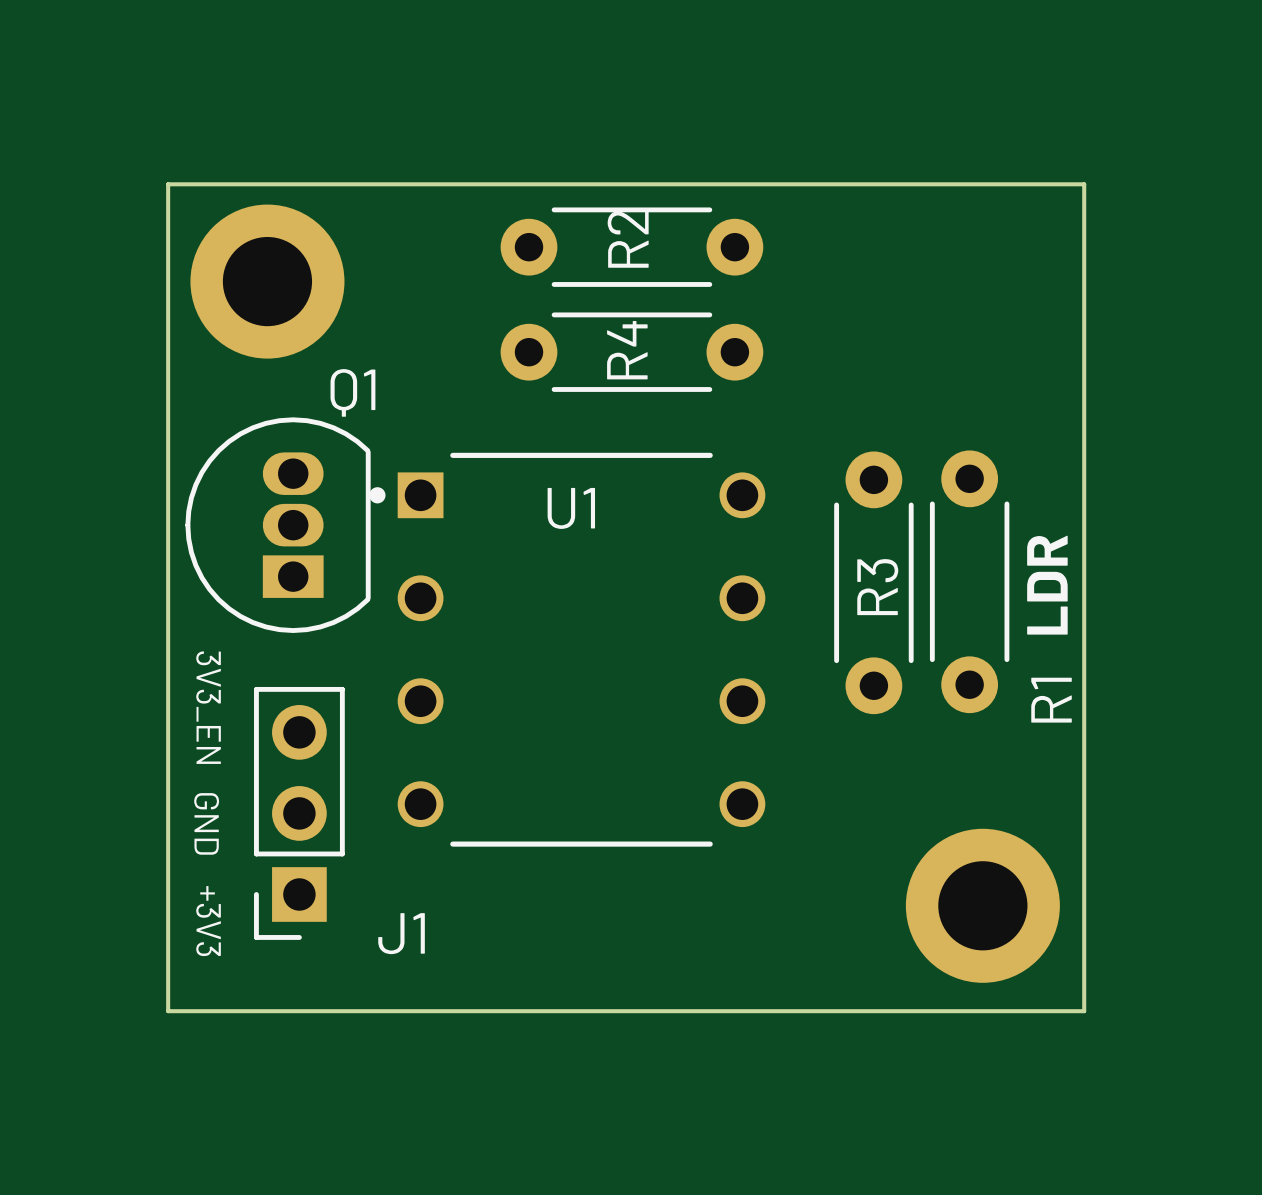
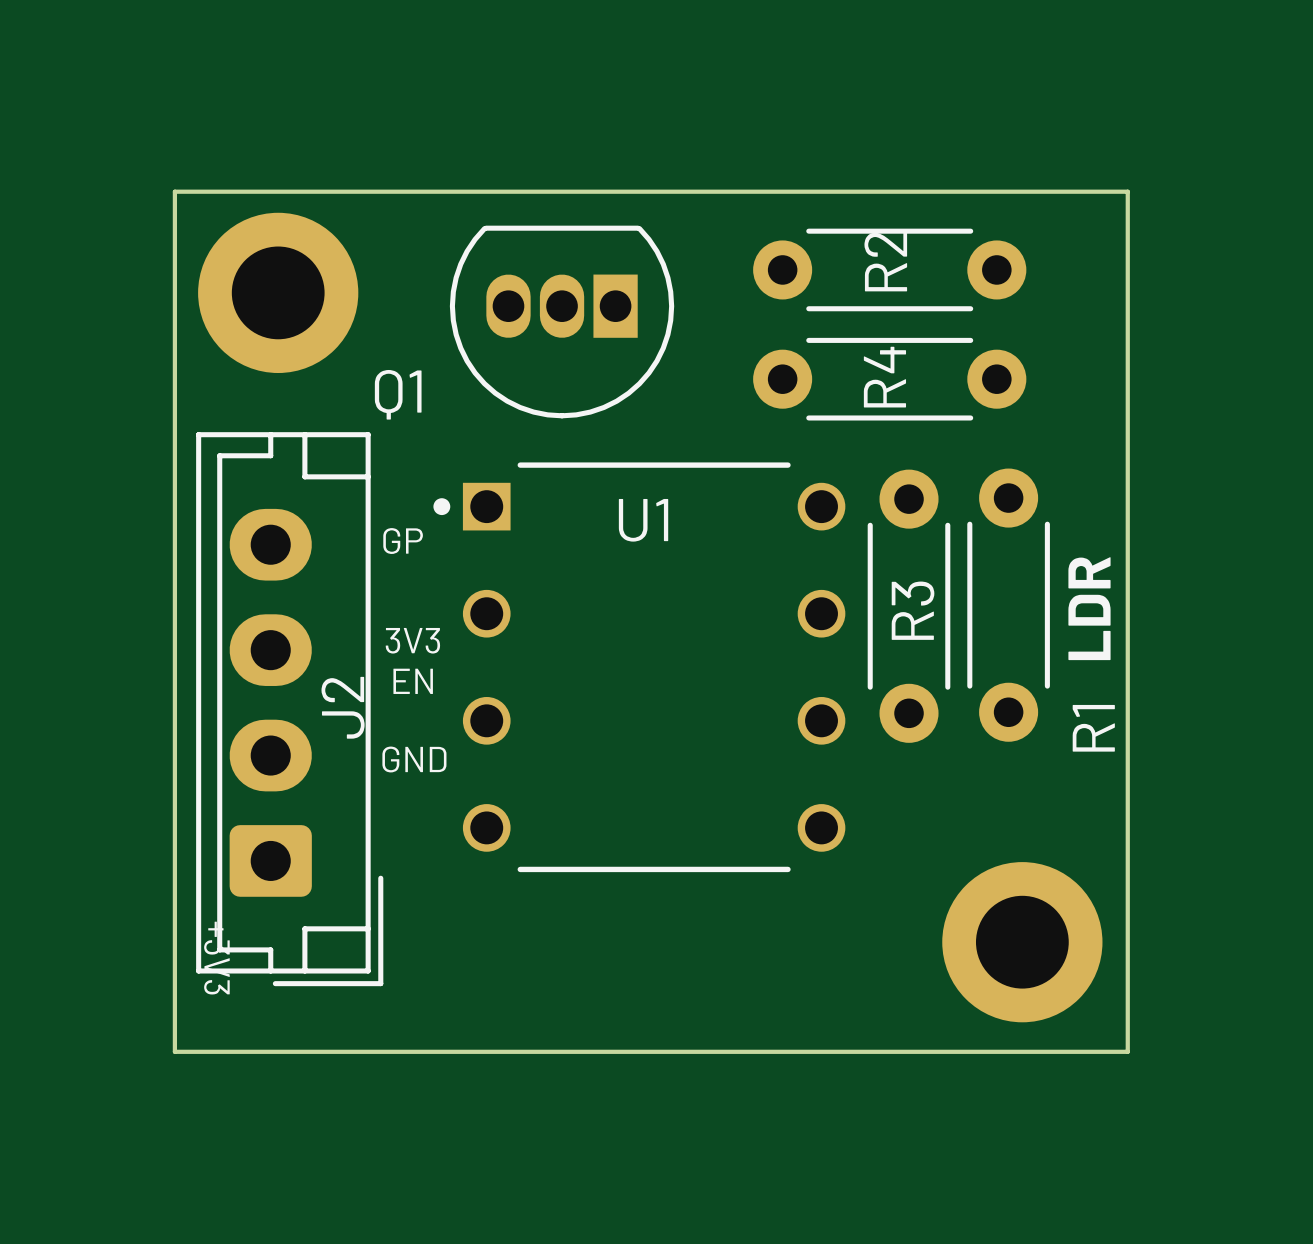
R2 position: (631, 247) -> (889, 269)
R4 position: (631, 352) -> (889, 379)
Q1 name position: Q1 (352, 392) -> Q1 (398, 394)
text: none -> GP (403, 541)
Q1 rotation: 0° (278, 525) -> 90° counterclockwise (562, 321)
Q1 position: (278, 525) -> (562, 321)
text: none -> 3V3 (412, 640)
U1 position: (567, 649) -> (639, 667)
text: none -> EN (413, 681)
J2: none -> (289, 709)
text: 3V3_EN (208, 707) -> none
J1: (299, 813) -> none
text rotation: 0° (206, 823) -> 90° counterclockwise (414, 759)
text position: GND (206, 823) -> GND (414, 759)

